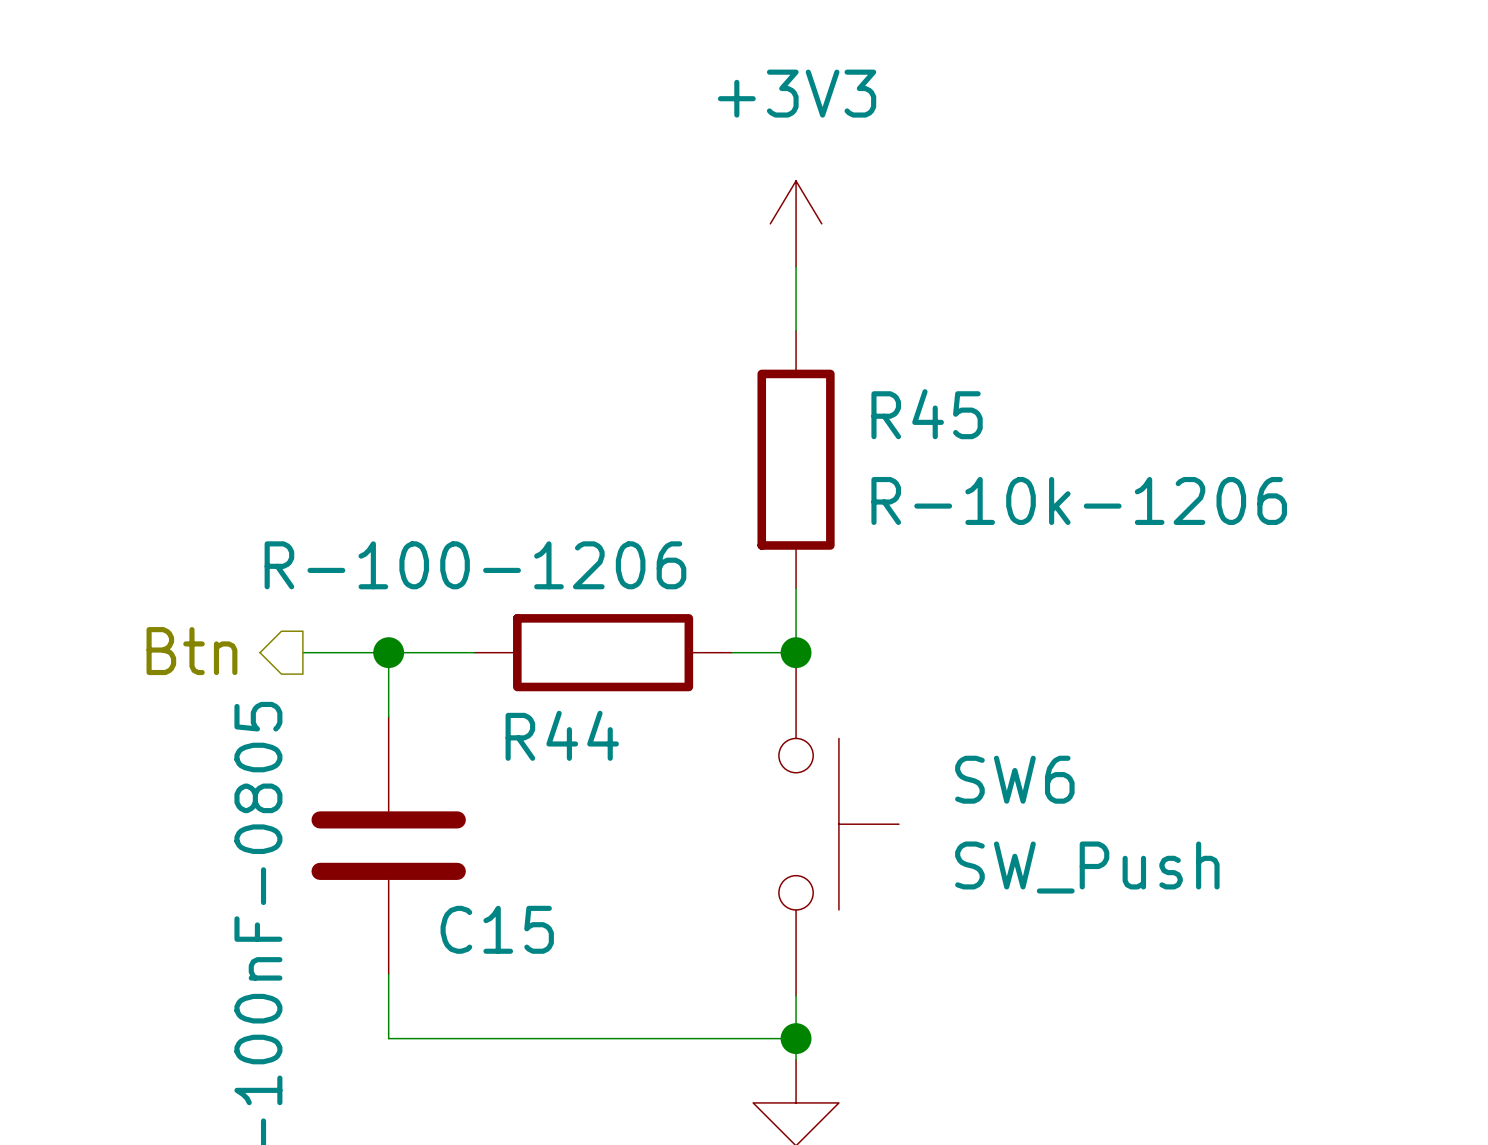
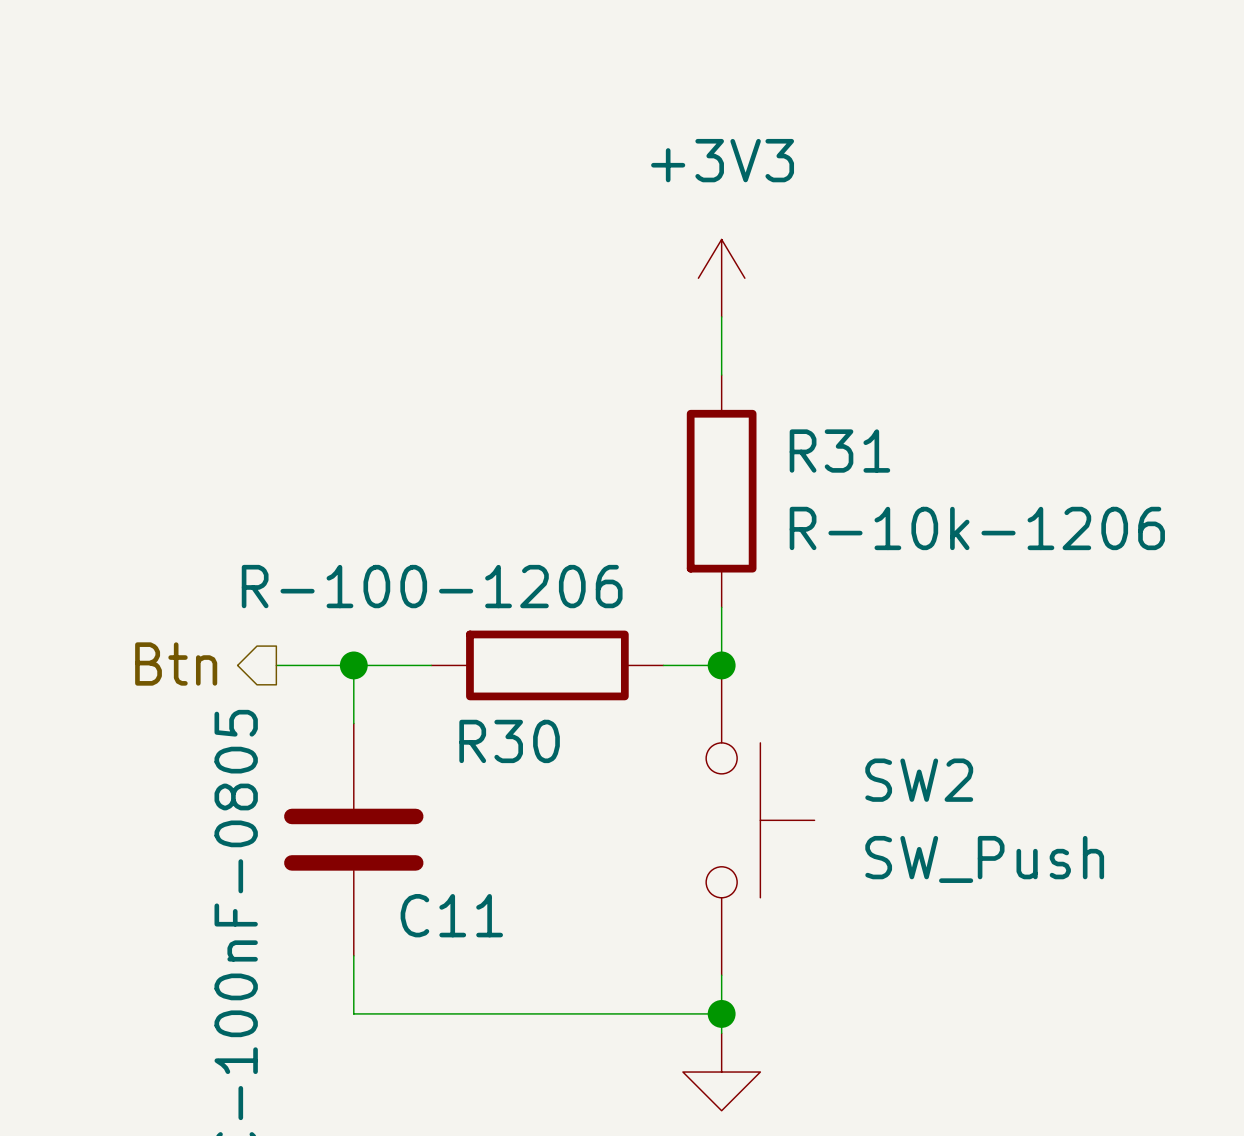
R45 name: R45 (927, 414) -> R31 (839, 451)
R44 name: R44 (562, 735) -> R30 (509, 741)
SW6 name: SW6 (1014, 779) -> SW2 (919, 780)
C15 name: C15 (497, 929) -> C11 (451, 915)

